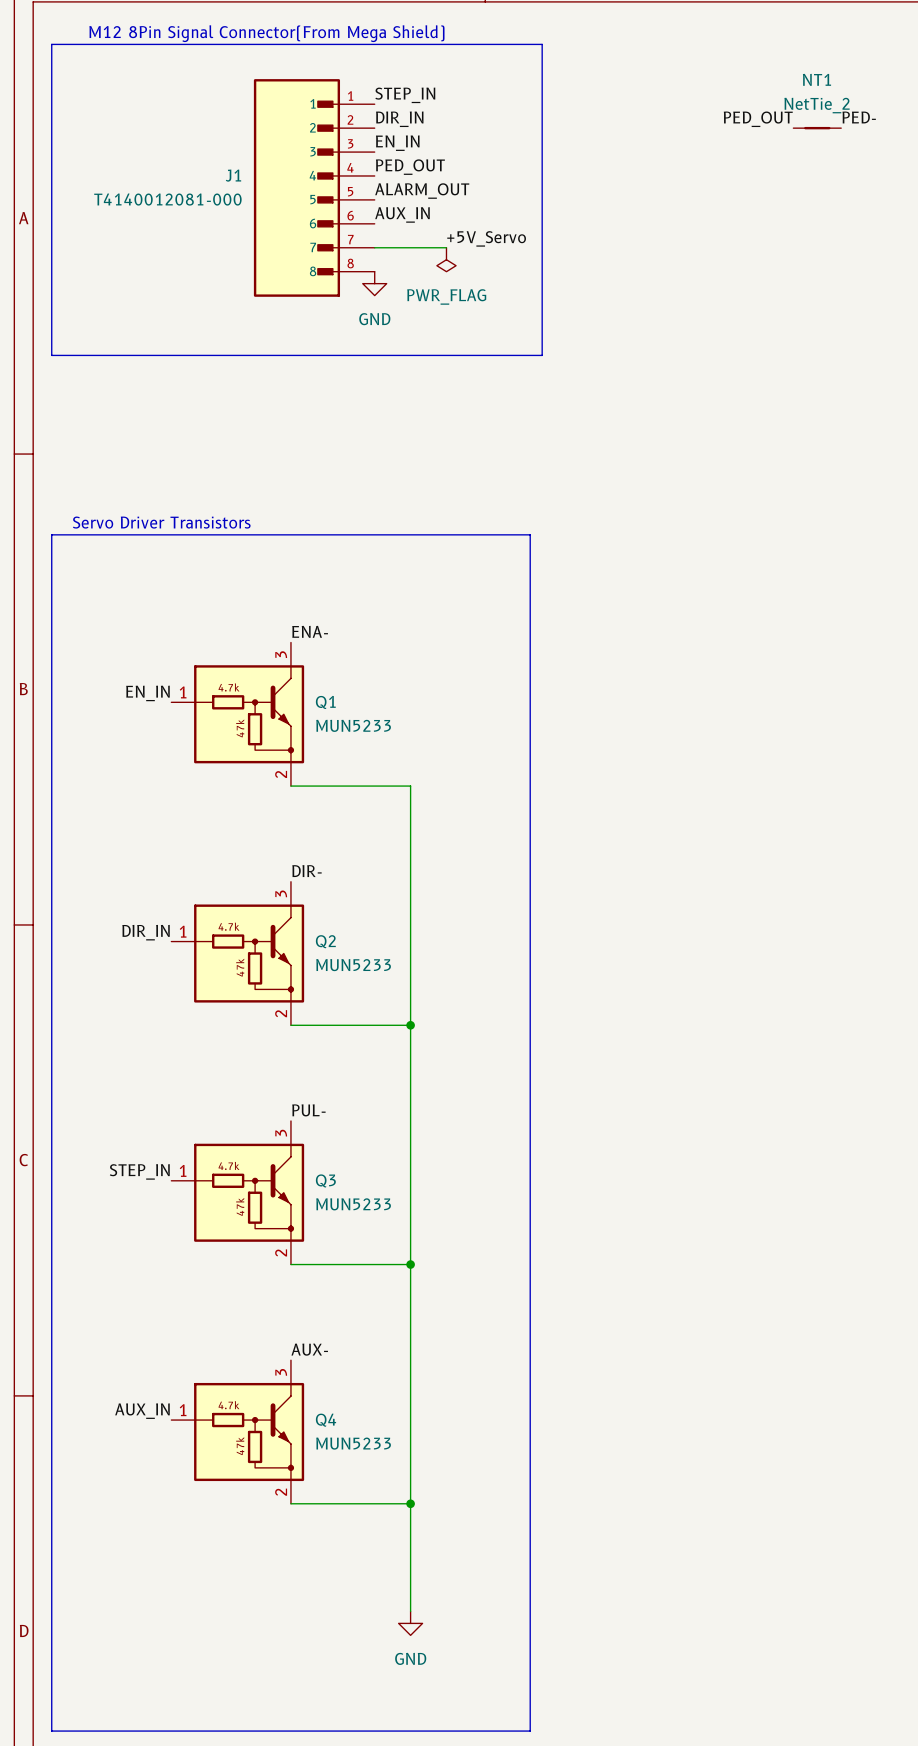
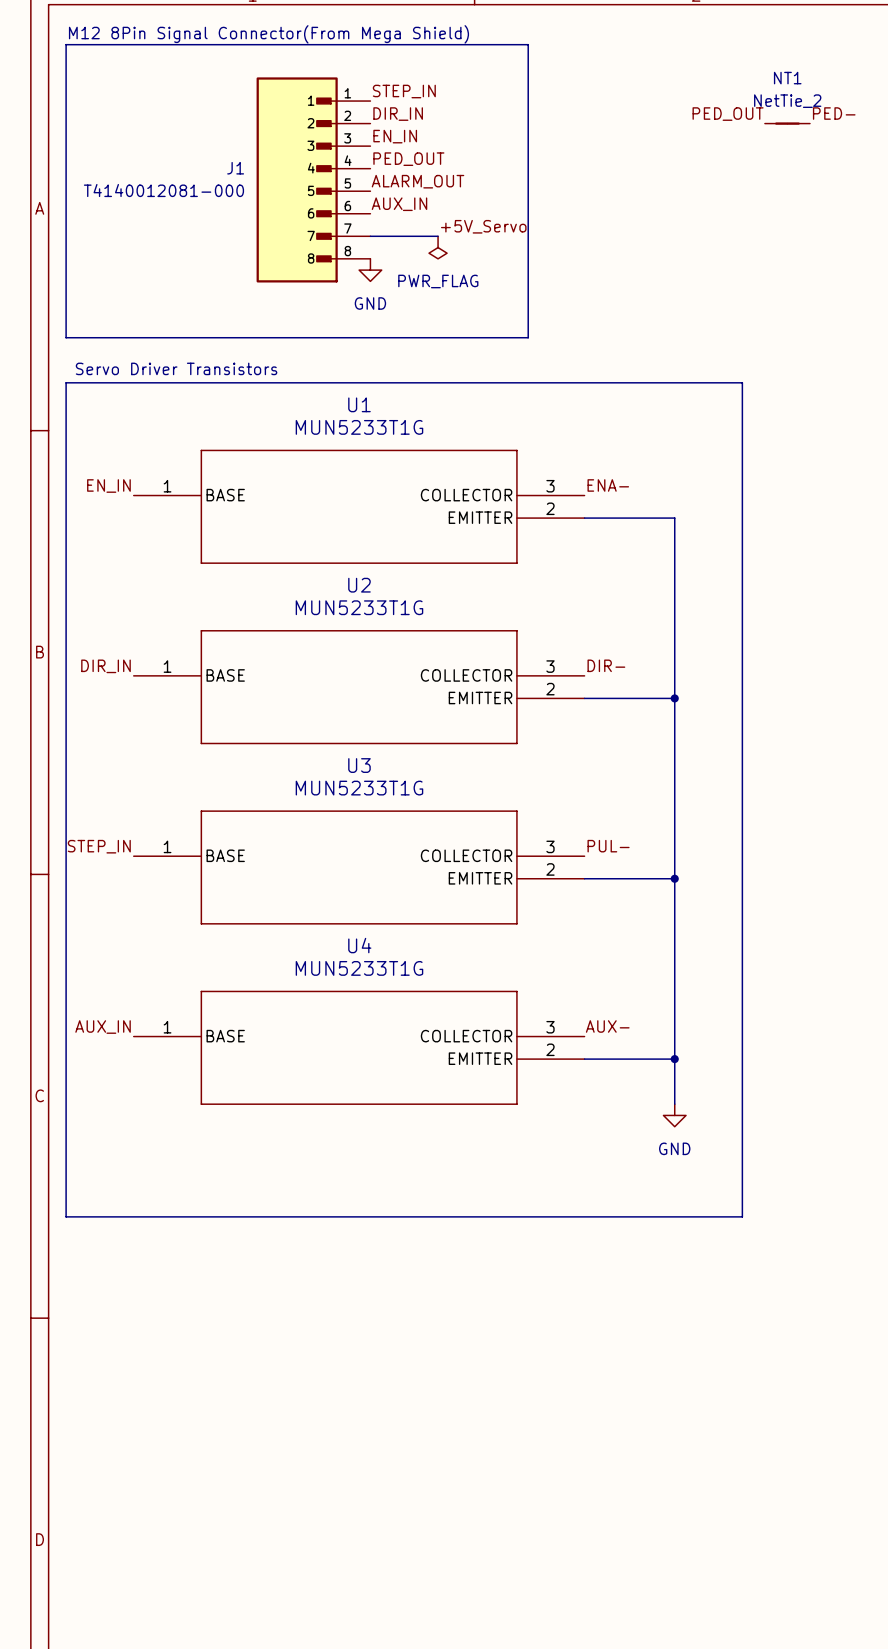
label: none -> ENA- (608, 485)
text position: Servo Driver Transistors (161, 522) -> Servo Driver Transistors (176, 368)
line: (51, 534) (530, 534) (530, 1731) (51, 1731) (51, 1288) -> (66, 506) (66, 382) (742, 382) (742, 1216) (66, 1216)
U1: none -> MUN5233T1G (359, 506)
wire: none -> (584, 518) (674, 518) (674, 1104)
label: ENA- (310, 631) -> none
label position: EN_IN (147, 693) -> EN_IN (108, 486)
label: none -> DIR- (606, 665)
Q1: MUN5233 (237, 714) -> none
U2: none -> MUN5233T1G (359, 687)
wire: none -> (584, 698) (674, 698)
junction: none -> (674, 698)
wire: (290, 786) (410, 786) (410, 1611) -> none
label: DIR- (306, 871) -> none
label: none -> PUL- (608, 846)
label: none -> STEP_IN (99, 846)
U3: none -> MUN5233T1G (359, 867)
wire: none -> (584, 878) (674, 878)
junction: none -> (674, 878)
label position: DIR_IN (146, 932) -> DIR_IN (106, 666)
Q2: MUN5233 (237, 953) -> none
wire: (290, 1025) (410, 1025) -> none
junction: (410, 1025) -> none
label: none -> AUX- (607, 1026)
label: none -> AUX_IN (103, 1027)
U4: none -> MUN5233T1G (359, 1047)
label: PUL- (308, 1110) -> none
wire: none -> (584, 1059) (674, 1059)
junction: none -> (674, 1059)
label: STEP_IN (139, 1171) -> none
power symbol: none -> GND (674, 1115)
Q3: MUN5233 (237, 1192) -> none
wire: (290, 1264) (410, 1264) -> none
junction: (410, 1264) -> none
label: AUX- (309, 1349) -> none
label: AUX_IN (142, 1411) -> none
Q4: MUN5233 (237, 1432) -> none
wire: (290, 1503) (410, 1503) -> none
junction: (410, 1503) -> none
power symbol: GND (410, 1623) -> none

